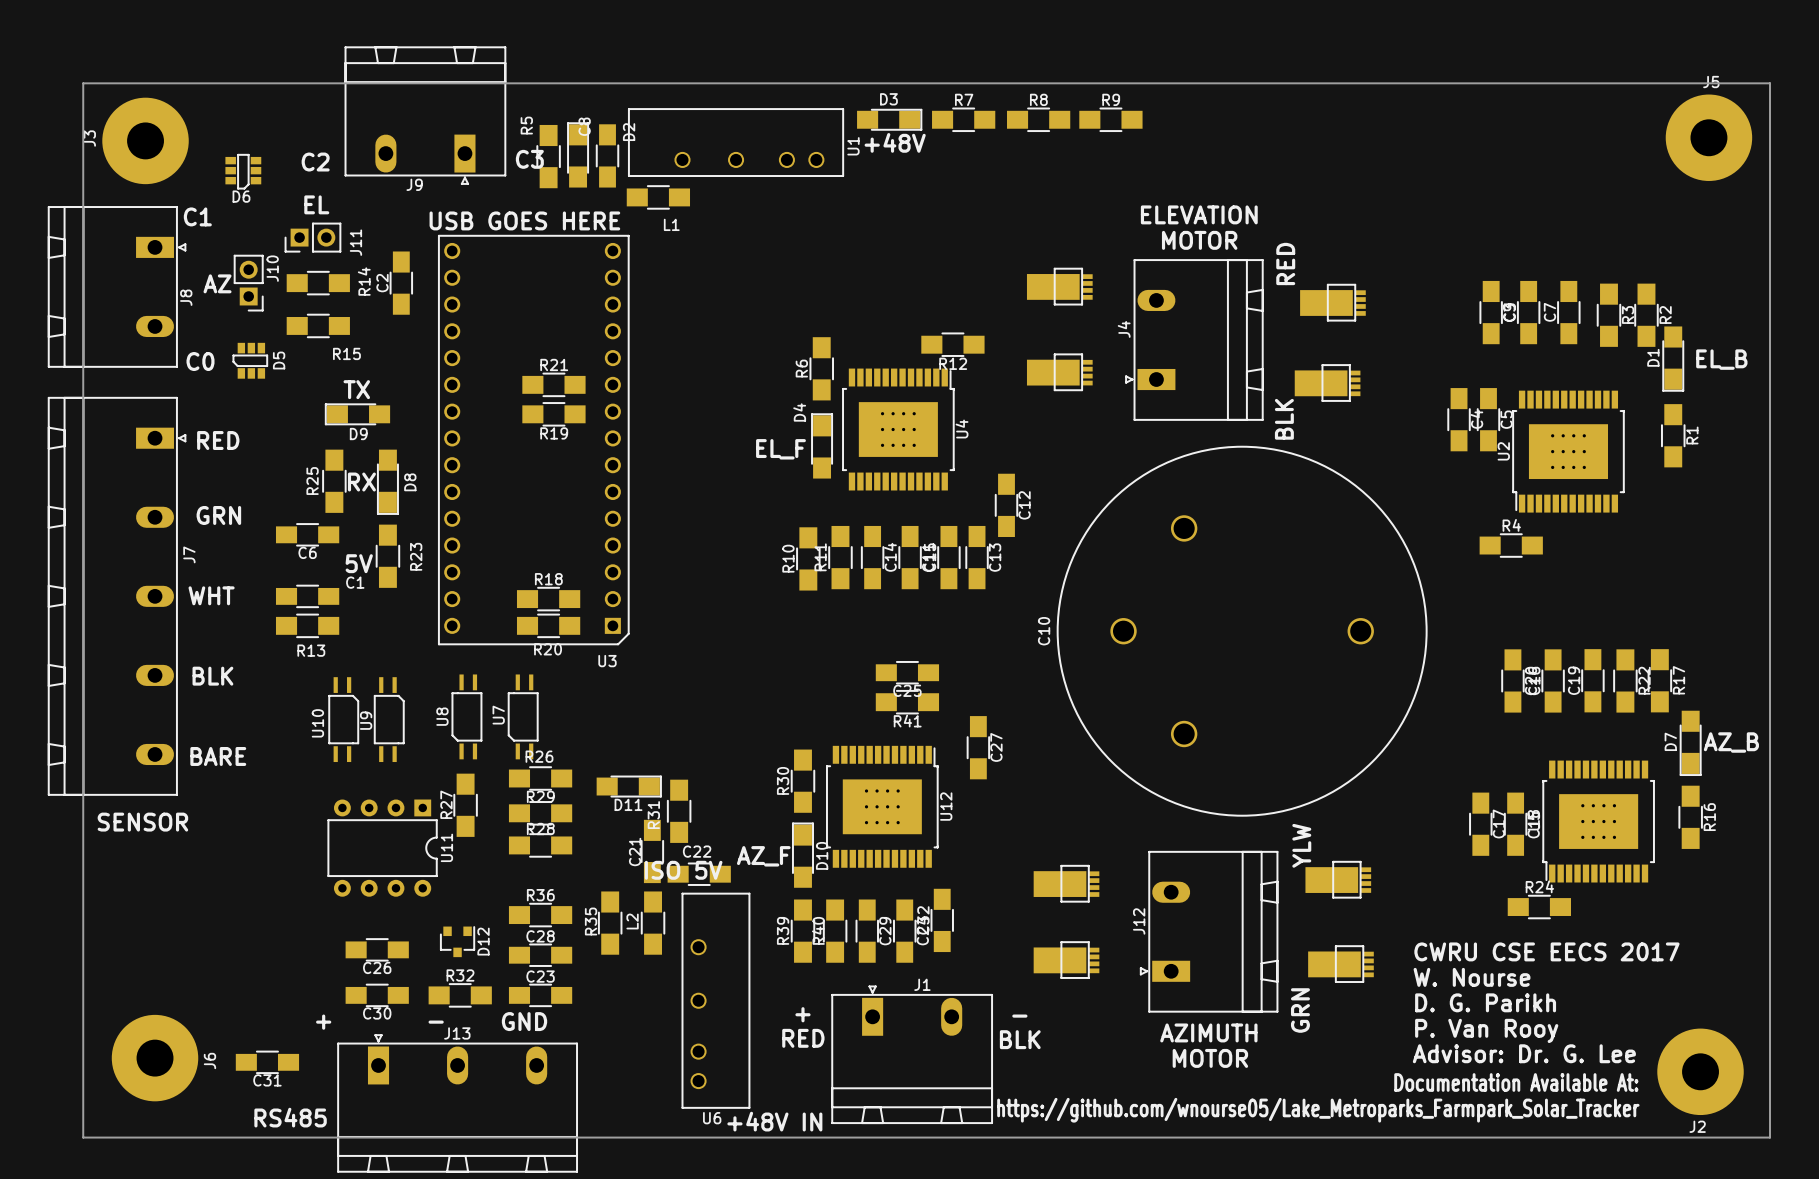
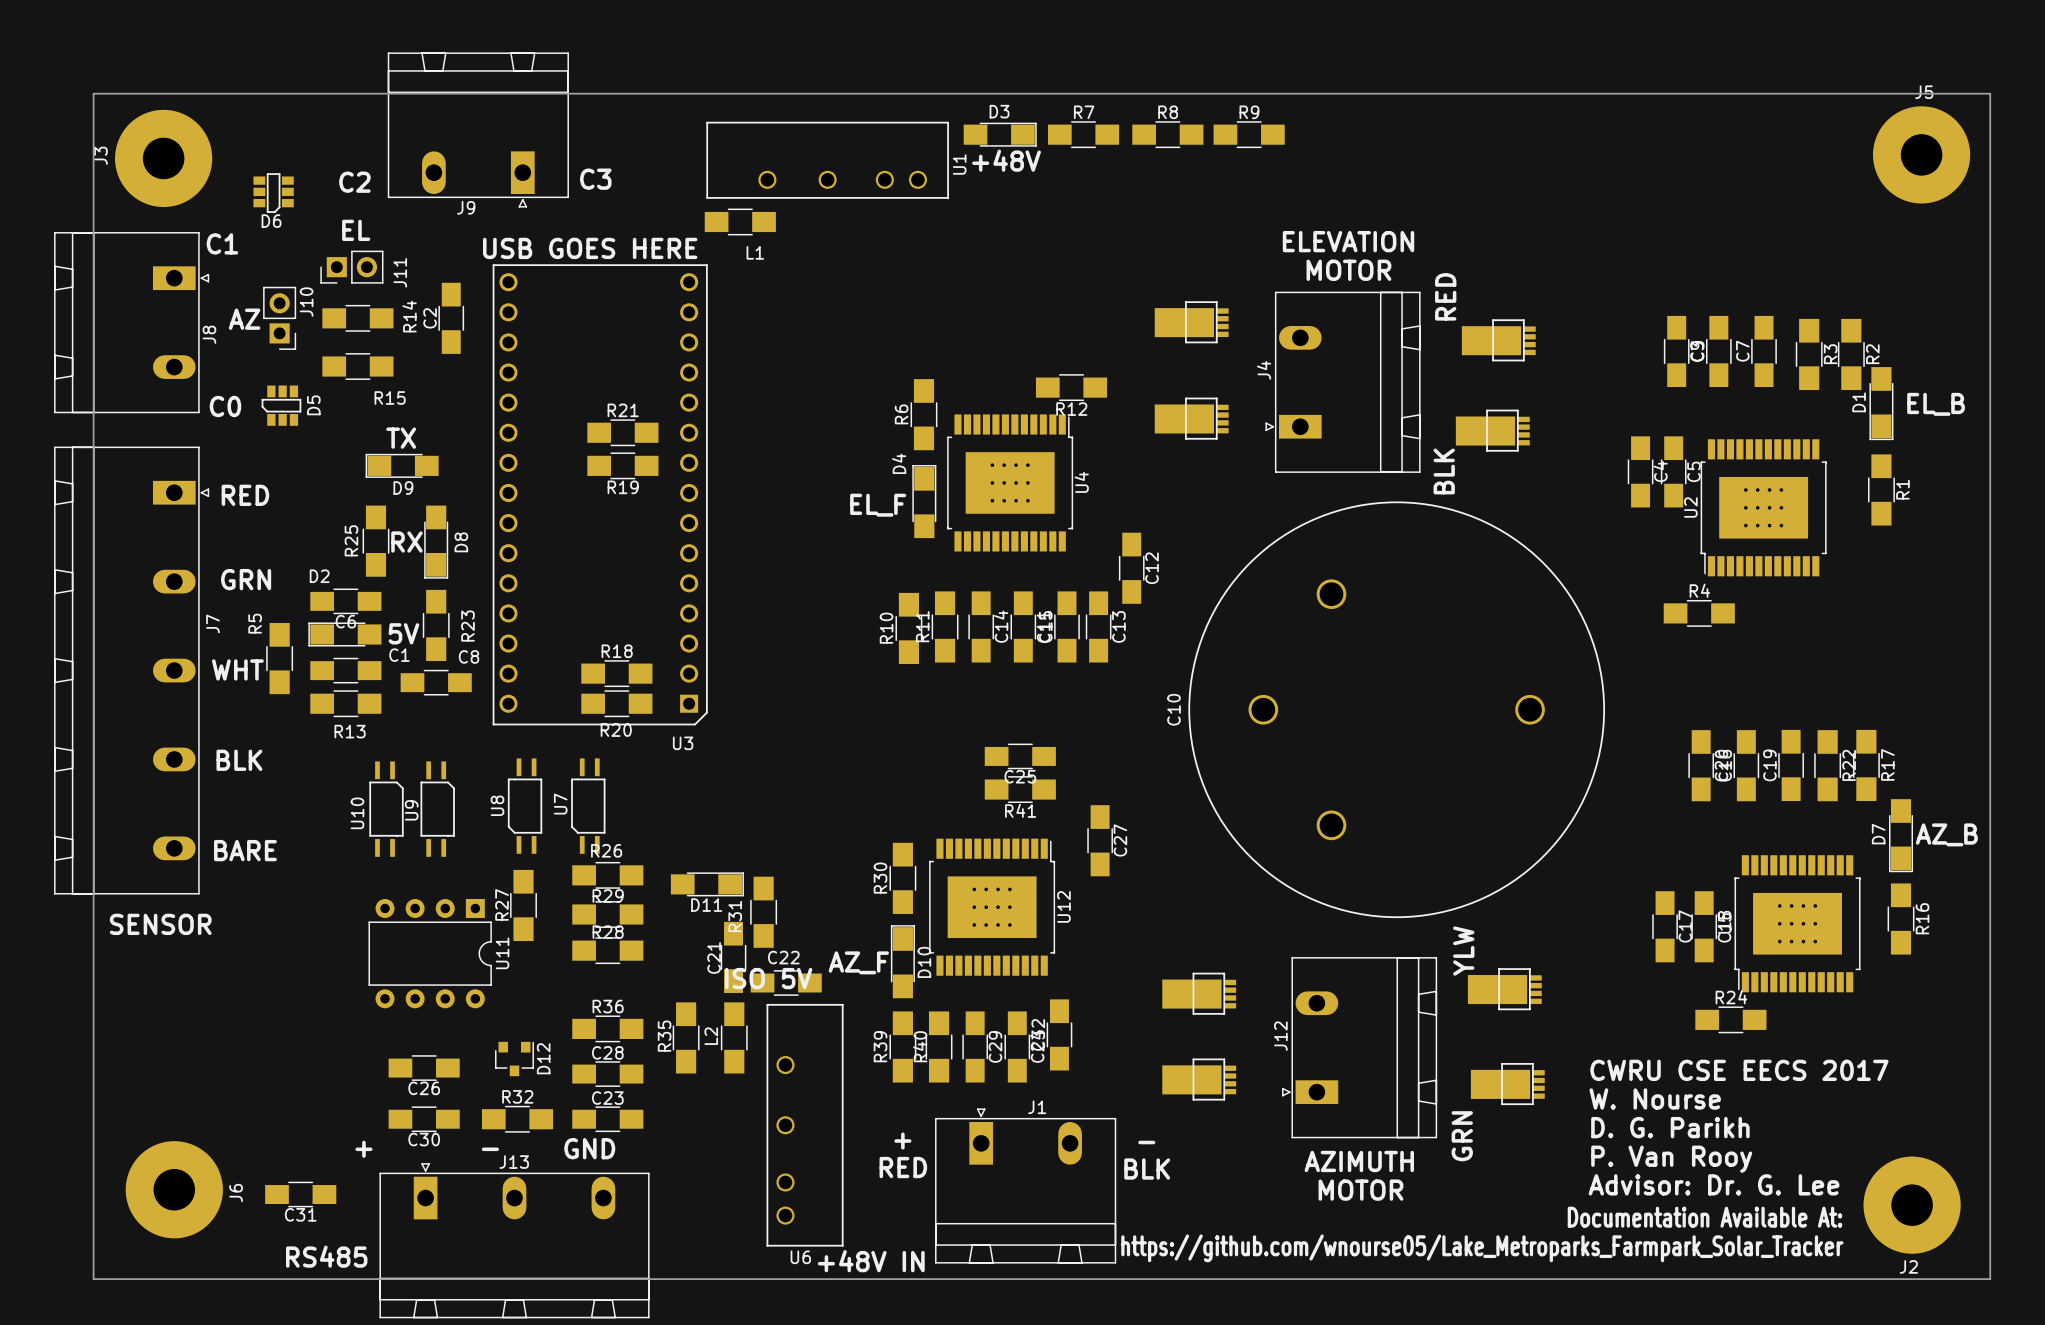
D2 rotation: 0° (578, 155) -> 90° counterclockwise (344, 634)
D2 position: (578, 155) -> (344, 634)
C8 rotation: 0° (607, 155) -> 90° clockwise (436, 682)
C8 position: (607, 155) -> (436, 682)
R5 position: (548, 156) -> (279, 658)

